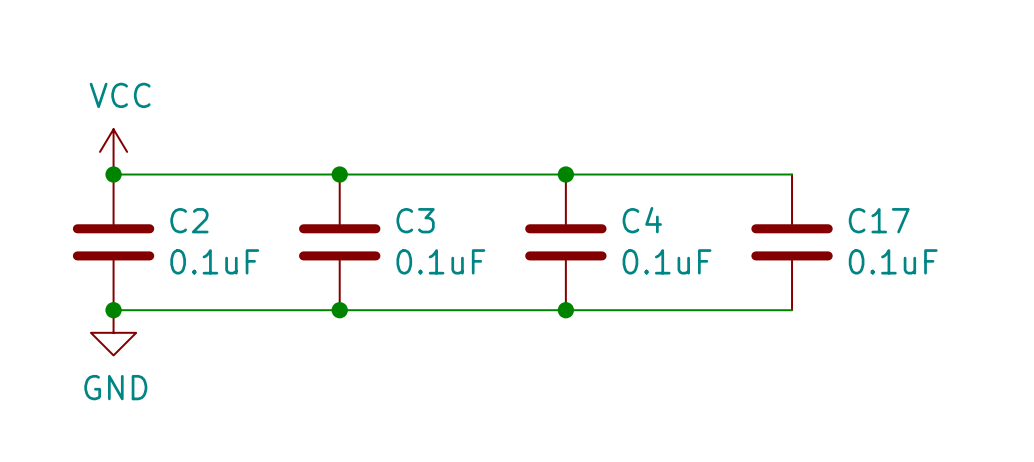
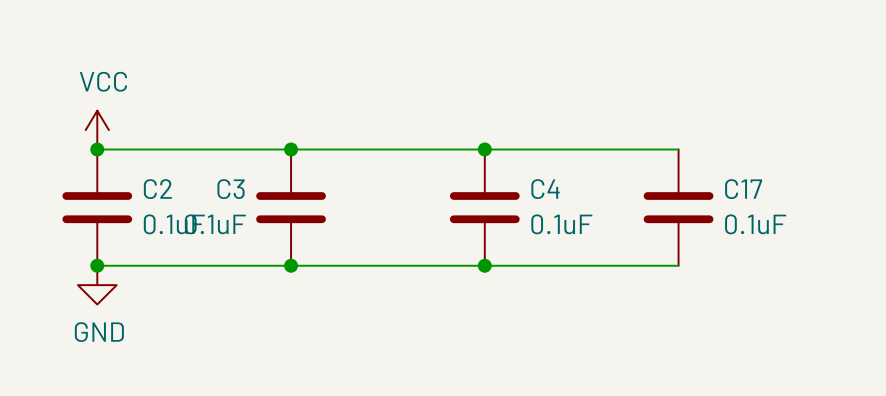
C3 name position: C3 (415, 220) -> C3 (231, 189)
C3 value position: 0.1uF (440, 261) -> 0.1uF (215, 224)

